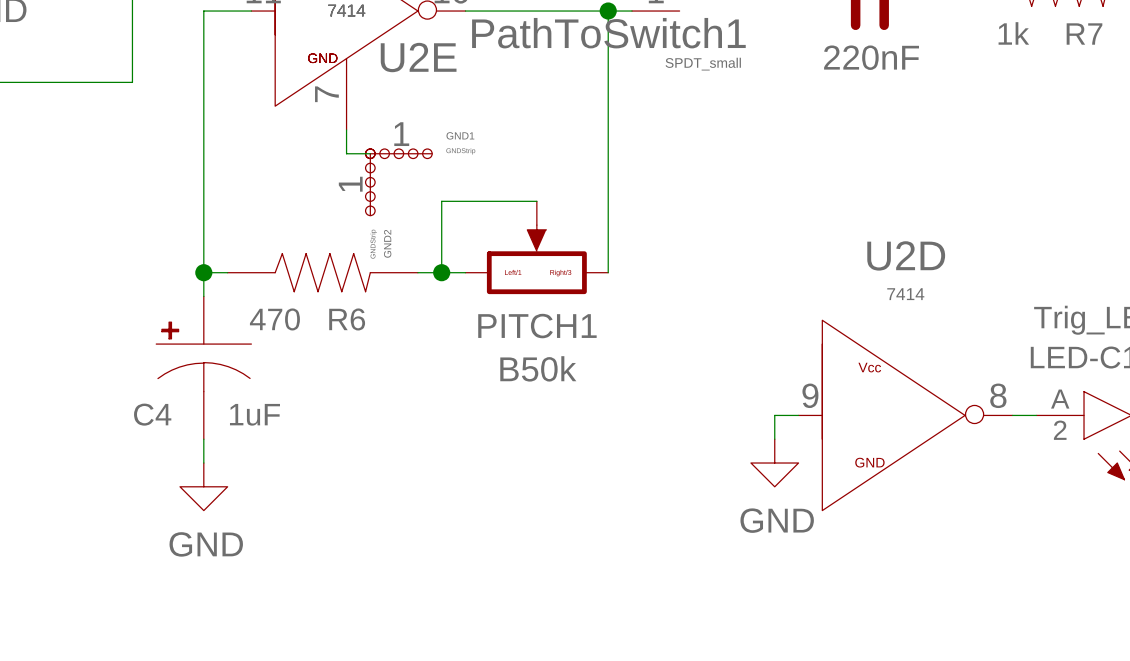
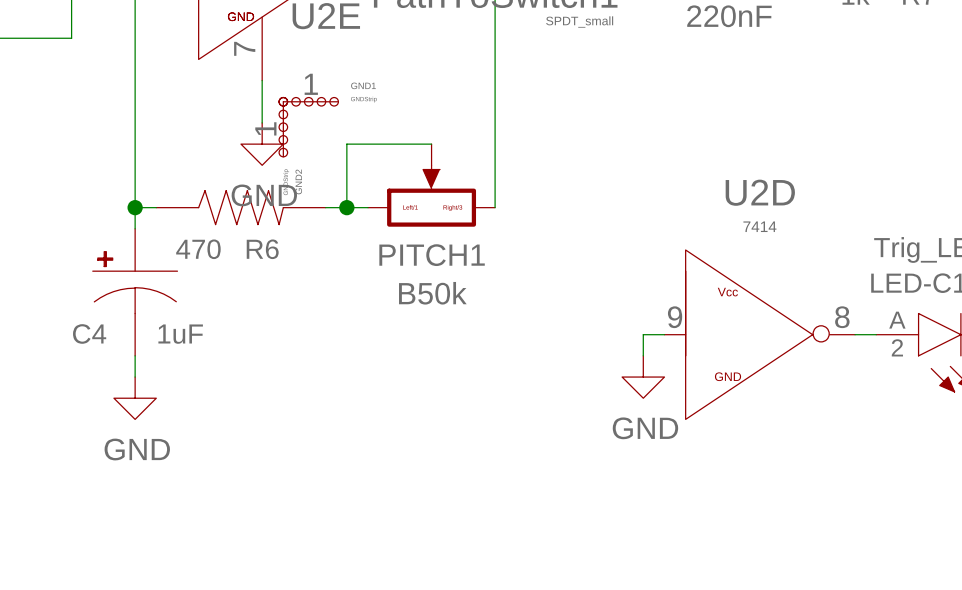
wire: (346, 153) (370, 153) -> (262, 101) (262, 122)
power symbol: none -> GND (262, 144)

